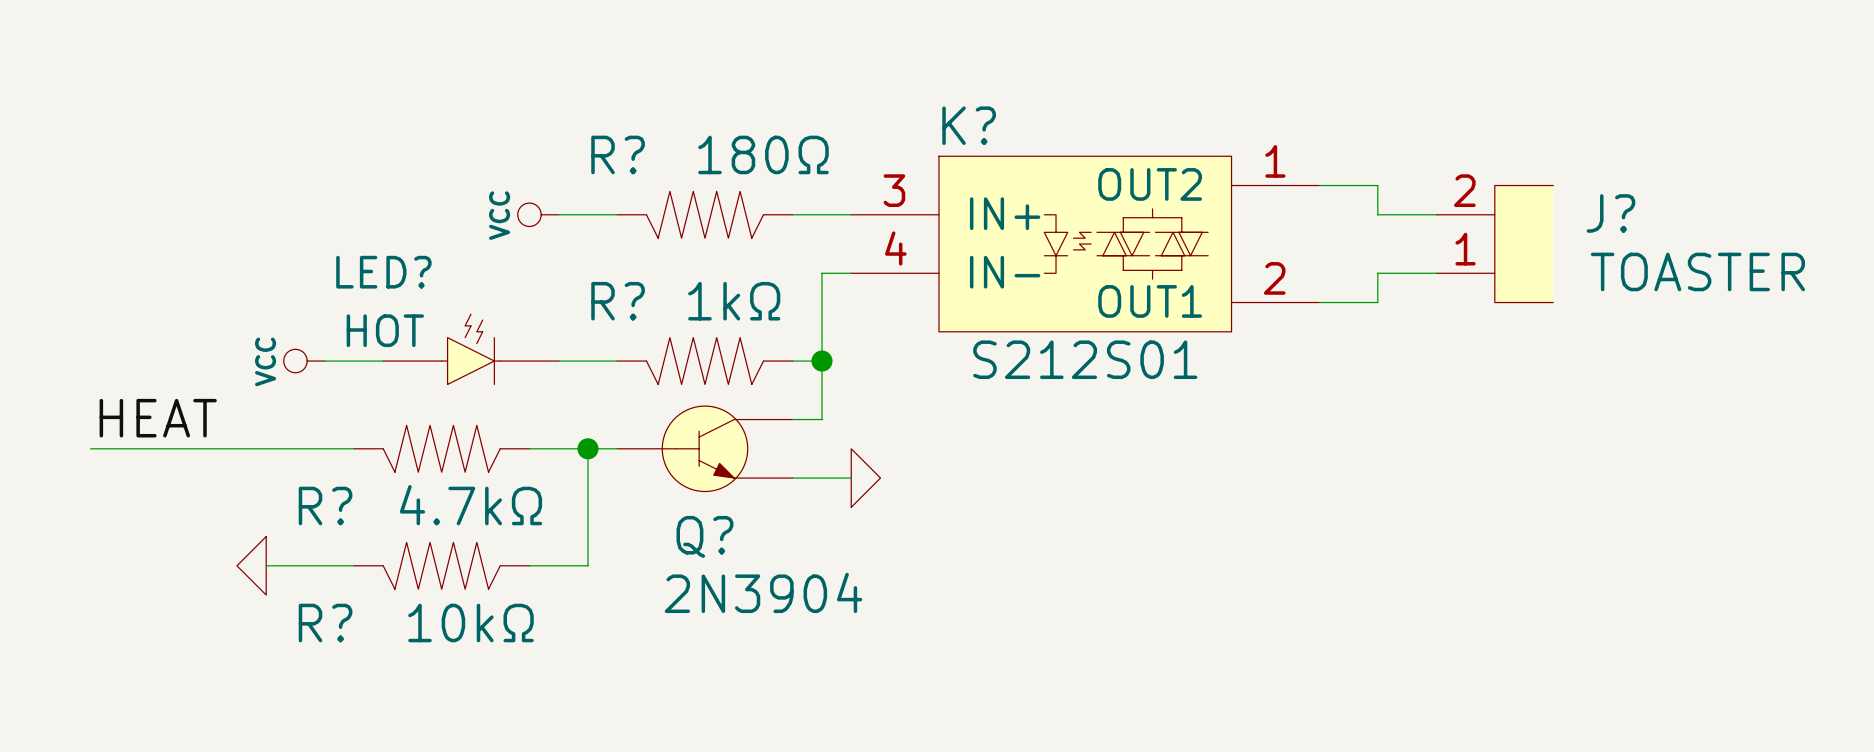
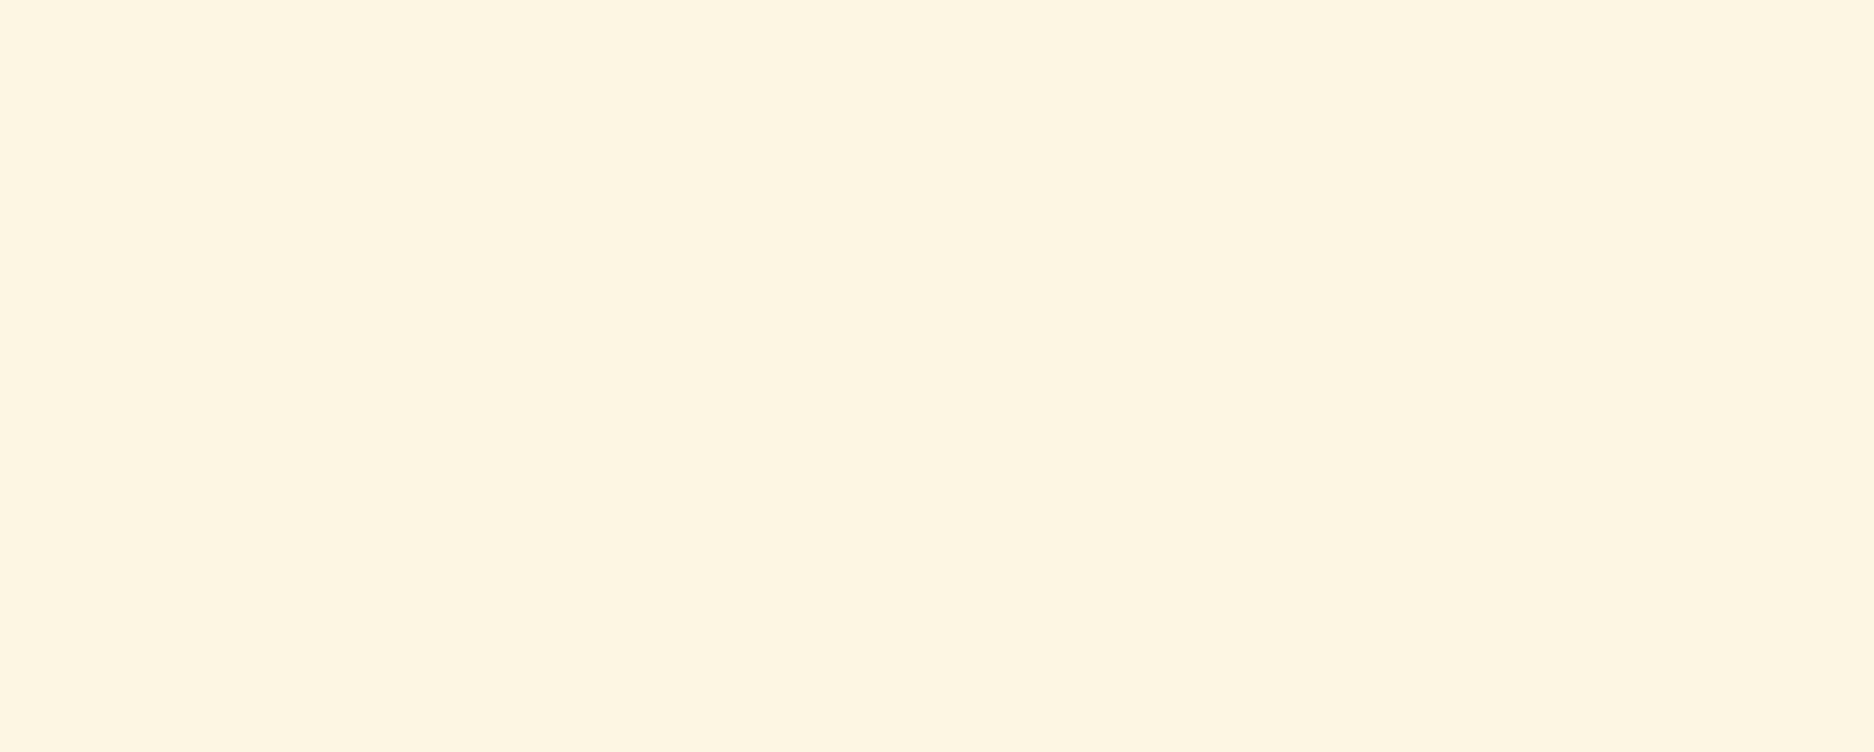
wire: (1319, 185) (1377, 185) (1377, 214) (1436, 214) -> none
power symbol: VCC (538, 214) -> none
wire: (558, 214) (617, 214) -> none
R?: 180Ω (704, 214) -> none
wire: (792, 214) (851, 214) -> none
K?: S212S01 (1085, 244) -> none
J?: TOASTER (1494, 244) -> none
wire: (851, 273) (822, 273) (822, 419) (792, 419) -> none
wire: (1436, 273) (1377, 273) (1377, 302) (1319, 302) -> none
LED?: HOT (470, 349) -> none
power symbol: VCC (304, 361) -> none
wire: (324, 361) (383, 361) -> none
wire: (558, 361) (617, 361) -> none
R?: 1kΩ (704, 361) -> none
wire: (792, 361) (822, 361) -> none
junction: (822, 361) -> none
label: HEAT (158, 418) -> none
wire: (90, 448) (353, 448) -> none
R?: 4.7kΩ (441, 448) -> none
wire: (529, 448) (617, 448) -> none
wire: (587, 448) (587, 565) (529, 565) -> none
junction: (587, 448) -> none
Q?: 2N3904 (704, 448) -> none
wire: (792, 478) (851, 478) -> none
power symbol: (865, 478) -> none
power symbol: (251, 565) -> none
wire: (266, 565) (353, 565) -> none
R?: 10kΩ (441, 565) -> none

